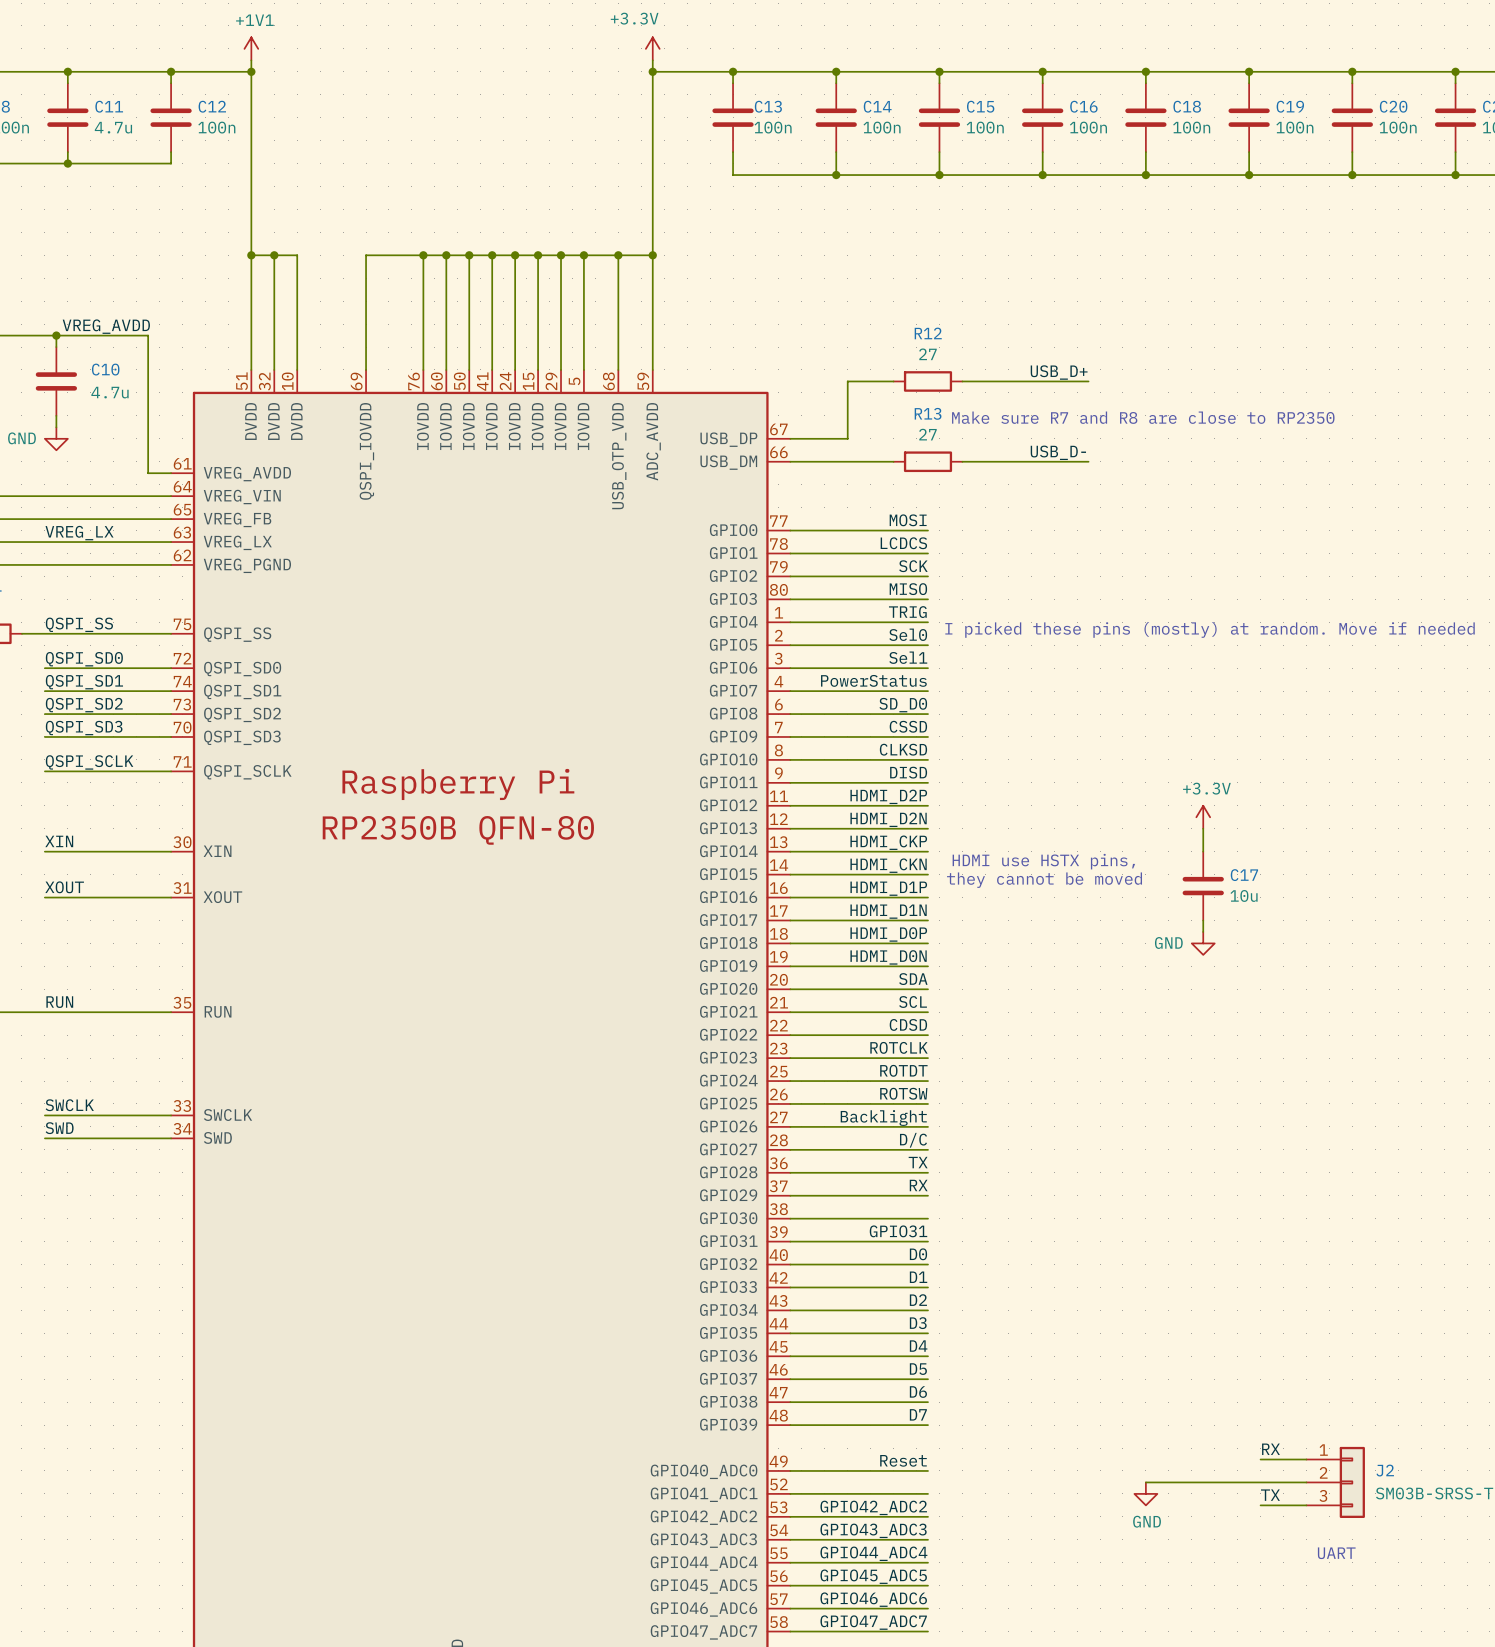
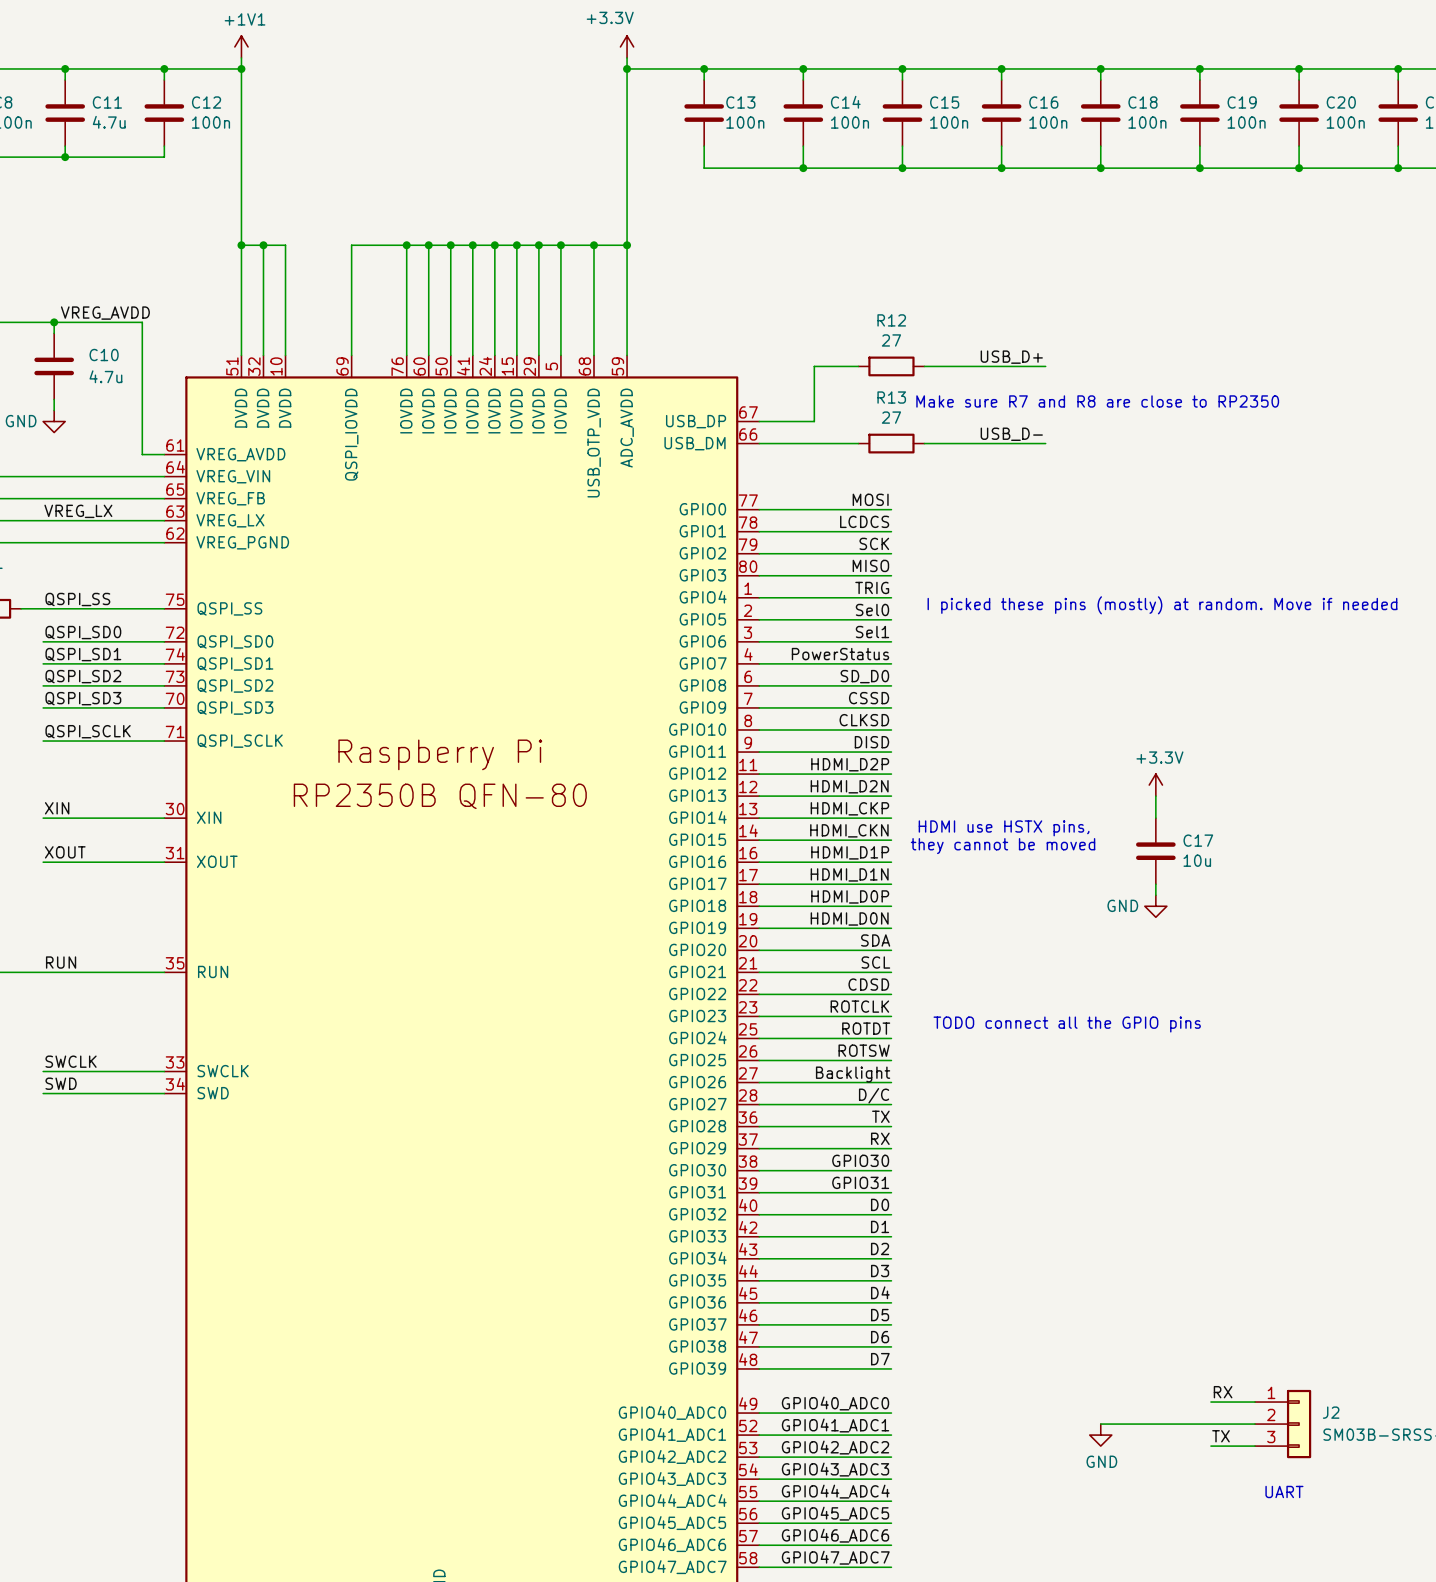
text: none -> TODO connect all the GPIO pins (1067, 1024)
label: none -> GPIO30 (860, 1160)
label: Reset (903, 1460) -> GPIO40_ADC0 (835, 1403)
label: none -> GPIO41_ADC1 (835, 1425)

